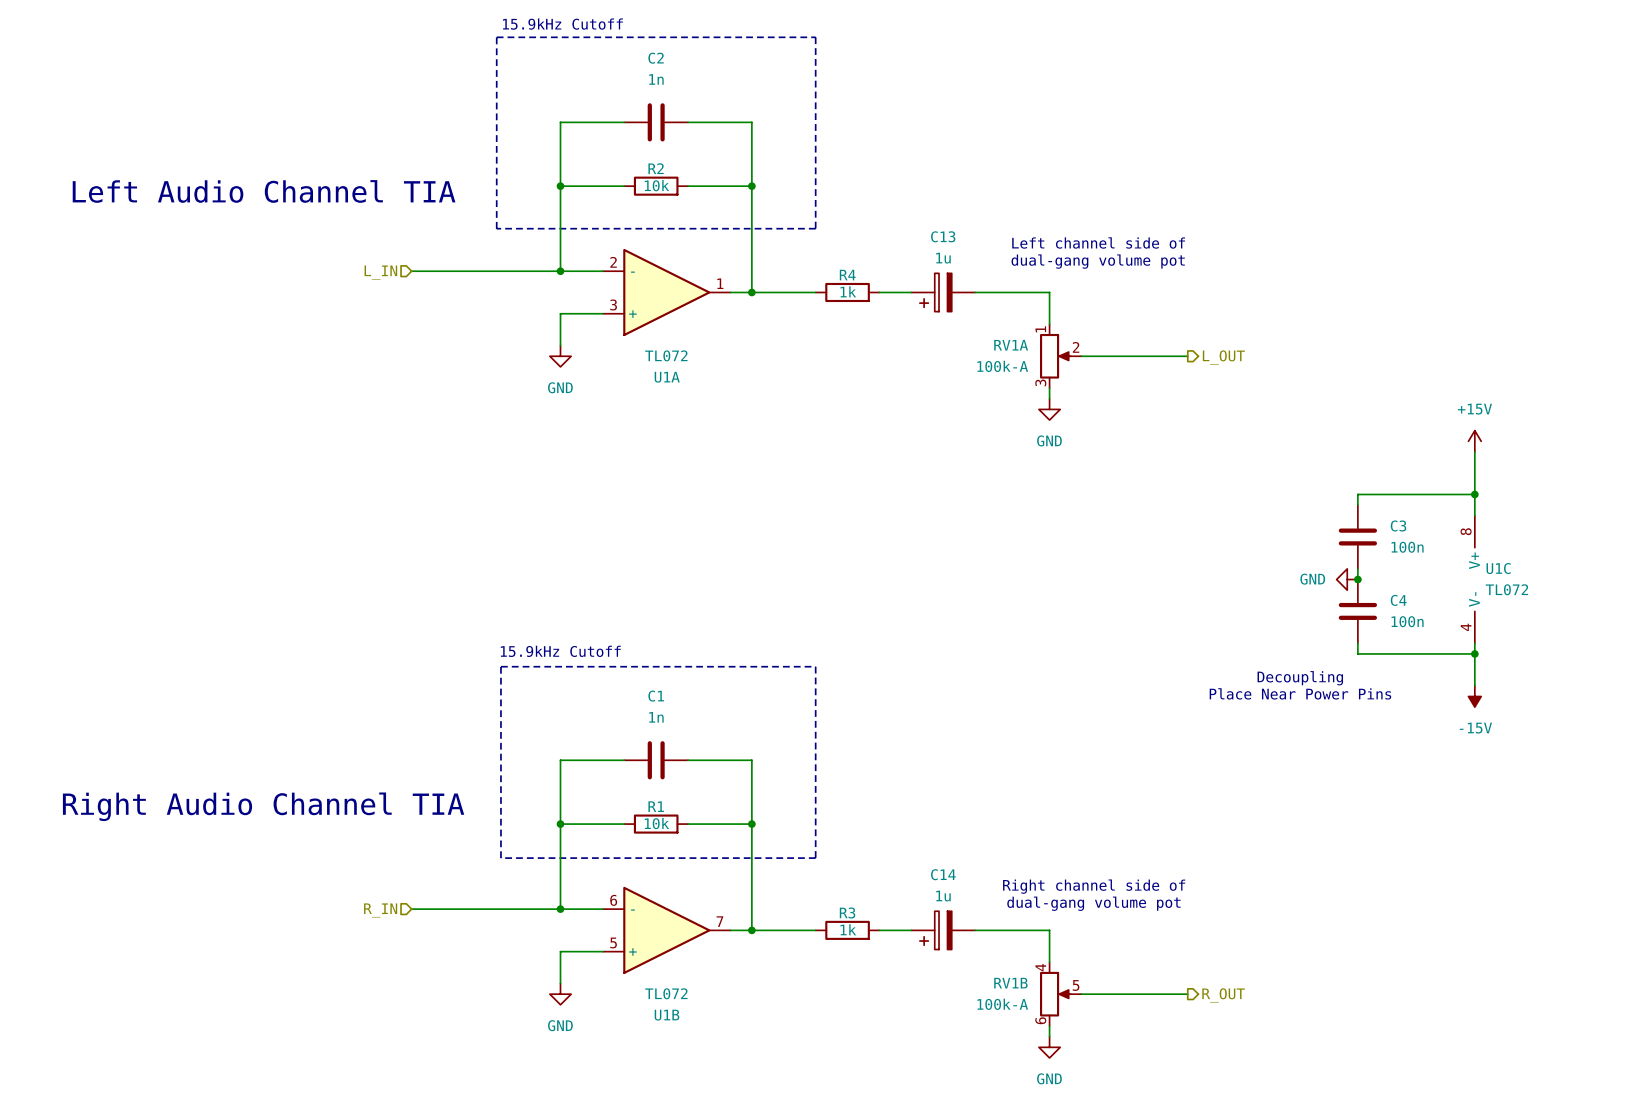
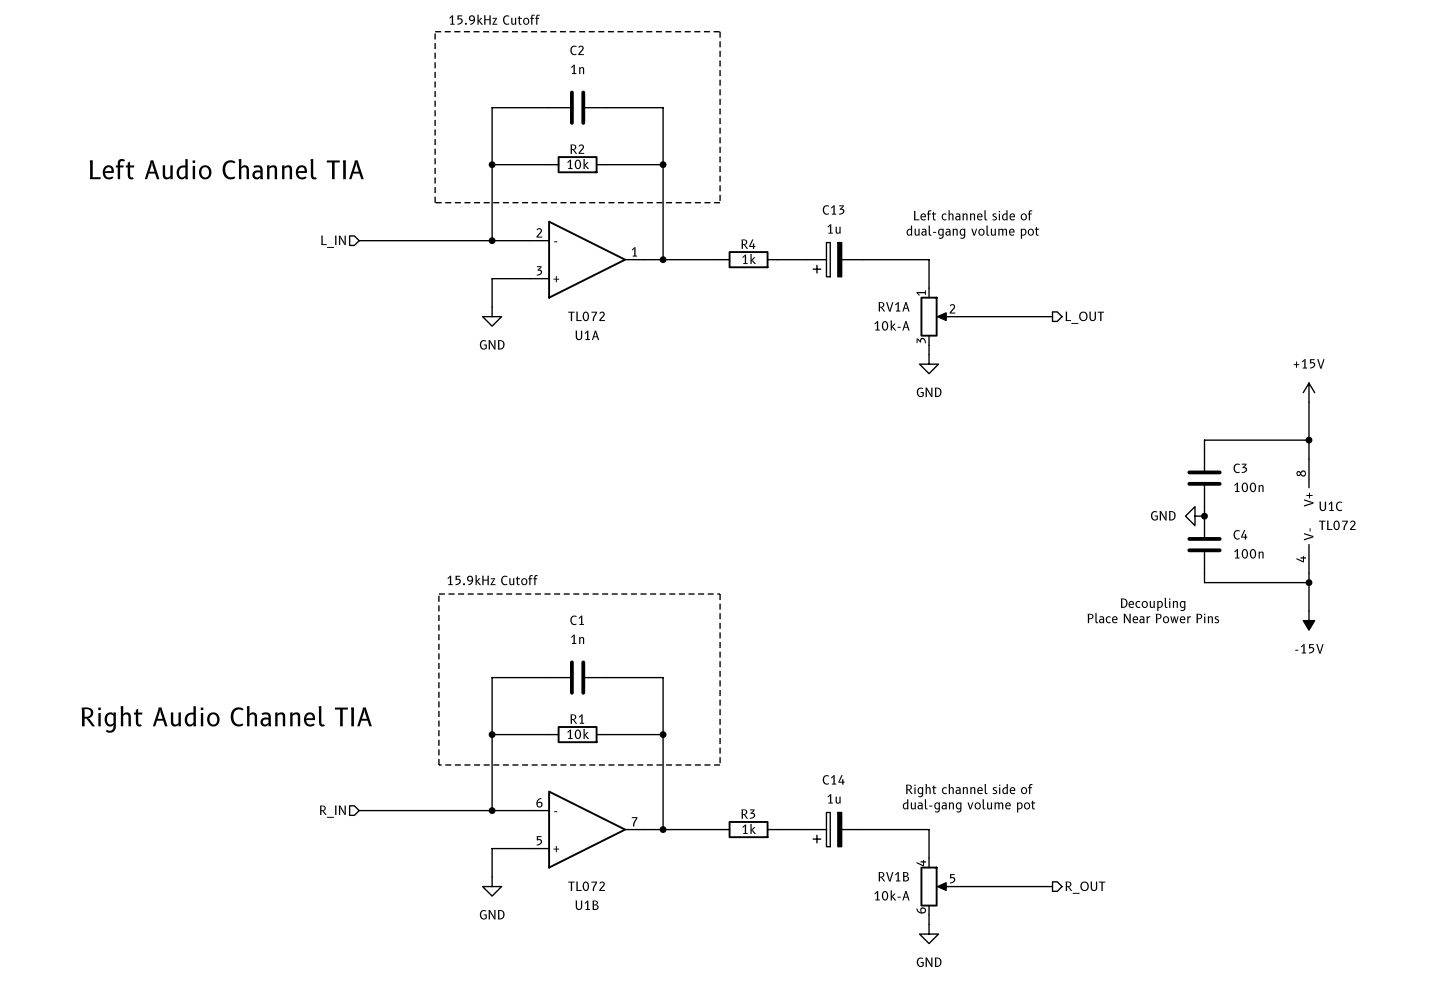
RV1A value: 100k-A (1002, 366) -> 10k-A (892, 325)
RV1B value: 100k-A (1002, 1004) -> 10k-A (892, 895)

